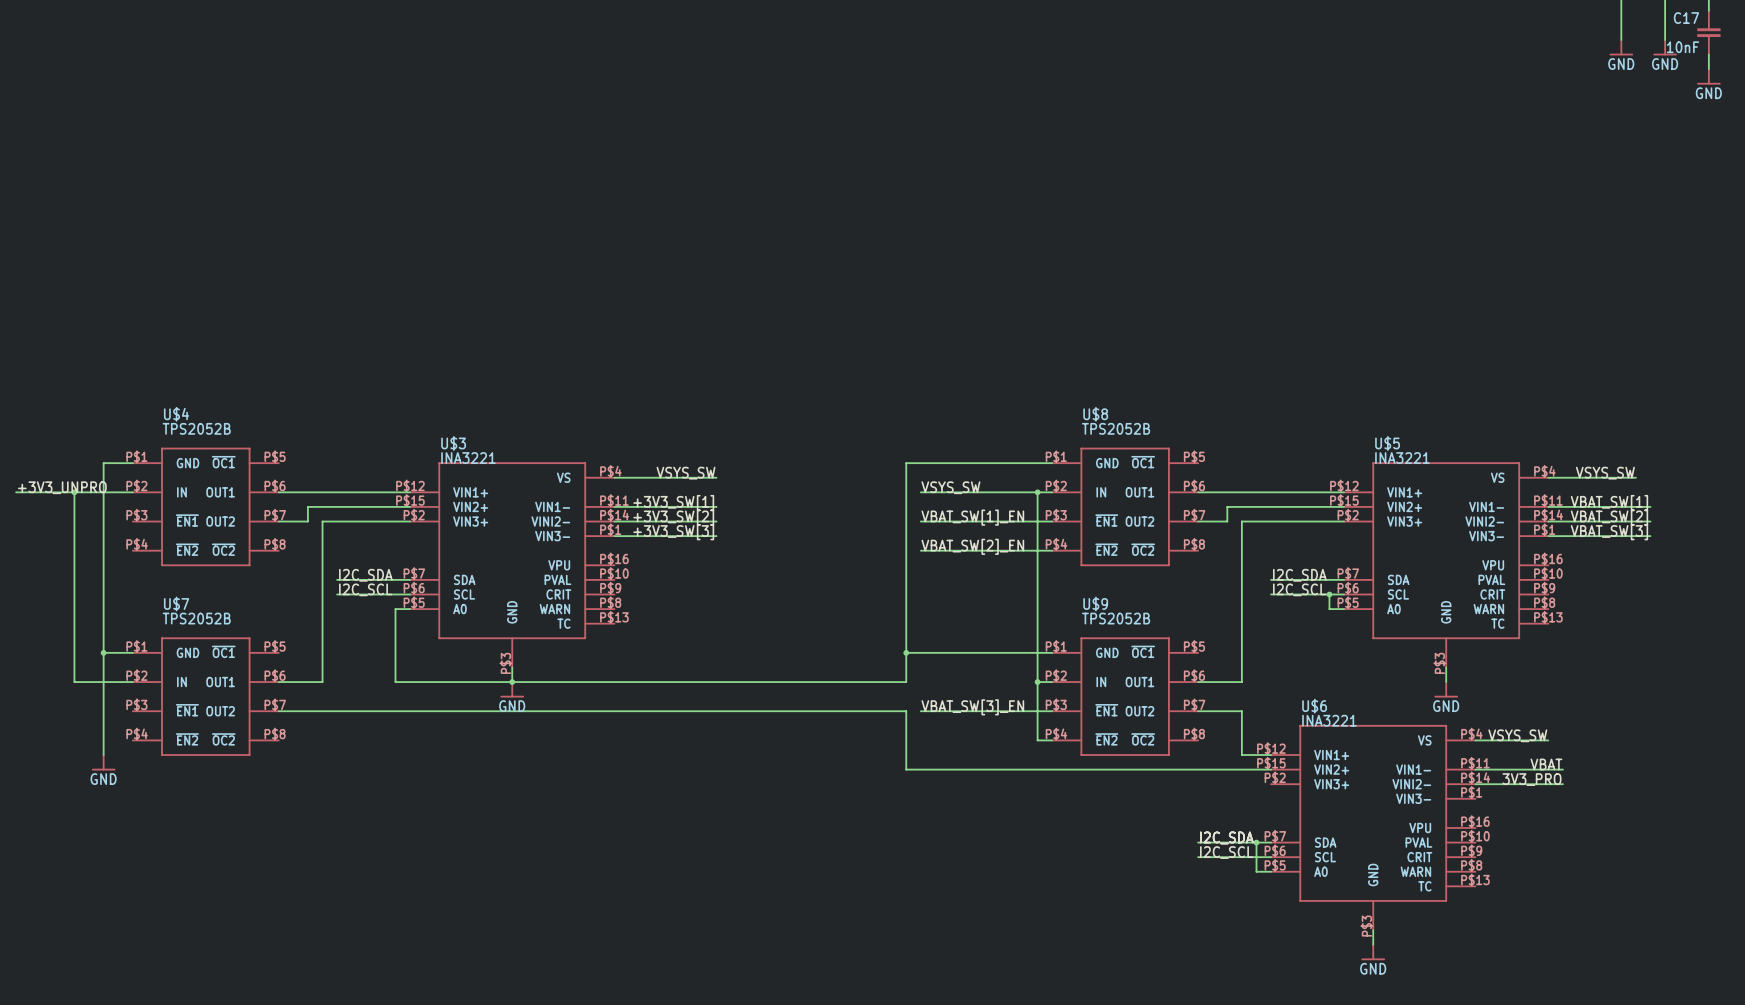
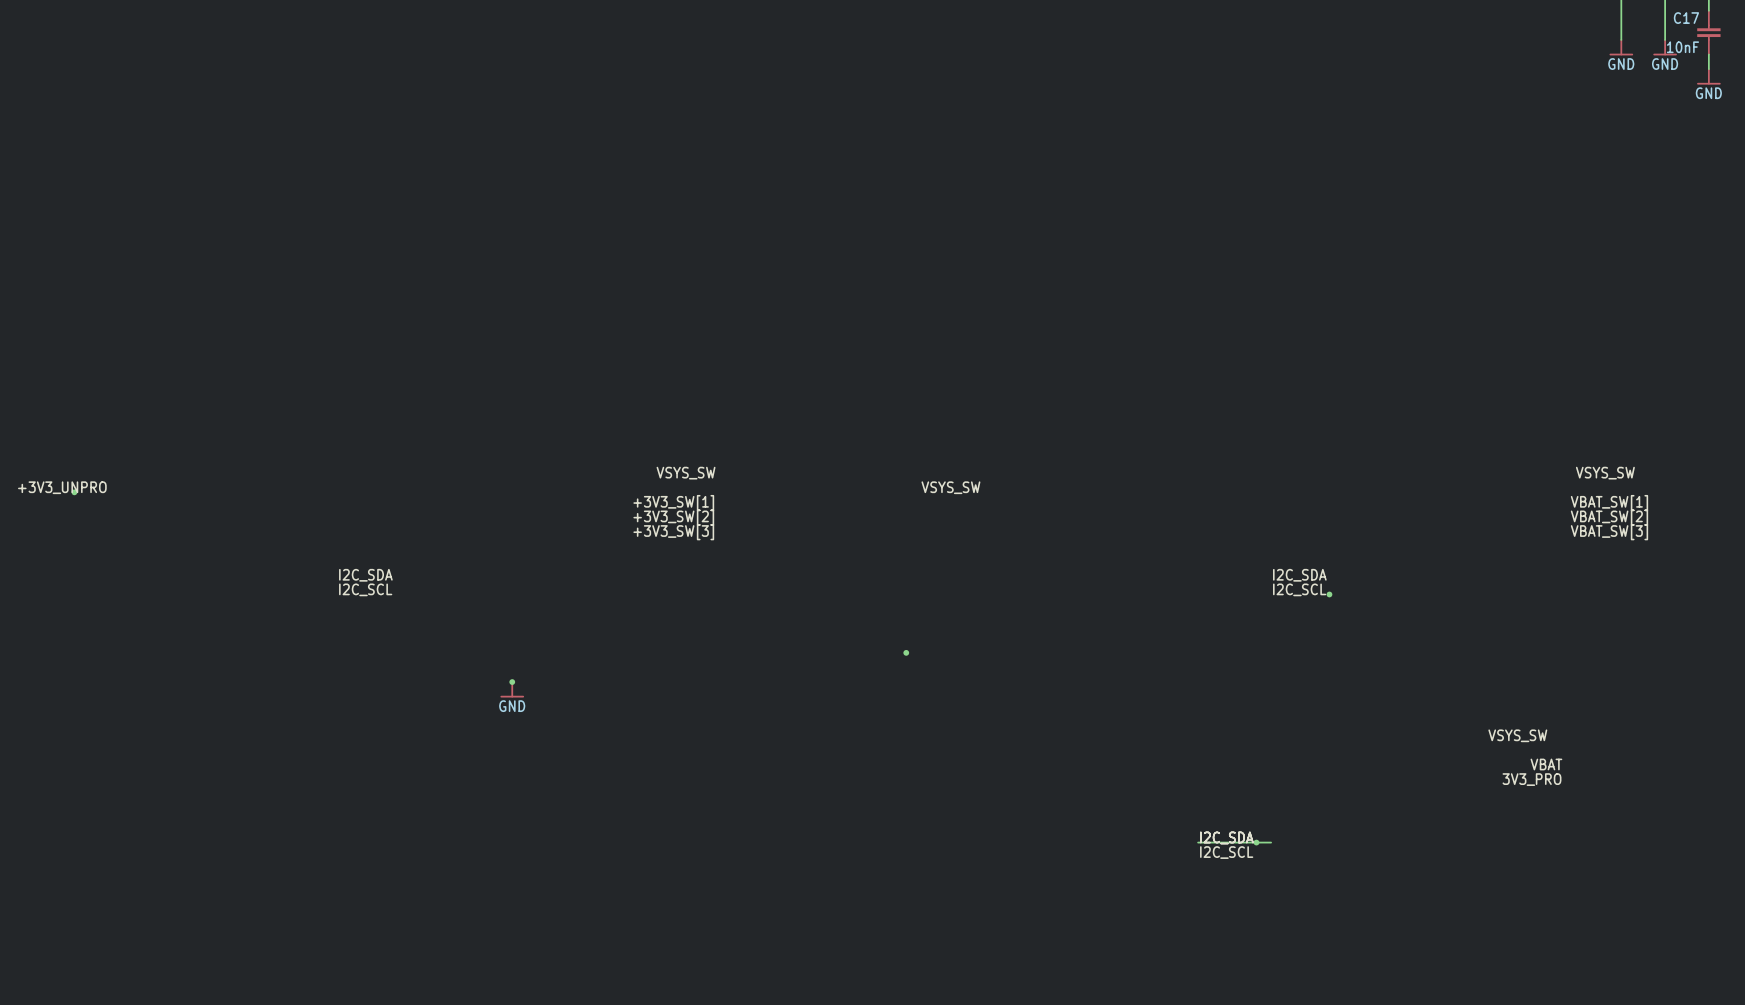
wire: (132, 463) (103, 463) (103, 755) -> none
wire: (1052, 463) (906, 463) (906, 682) (395, 682) (395, 609) (410, 609) -> none
wire: (614, 477) (716, 477) -> none
wire: (1548, 477) (1635, 477) -> none
wire: (16, 492) (132, 492) -> none
wire: (74, 492) (74, 682) (132, 682) -> none
wire: (278, 492) (410, 492) -> none
wire: (920, 492) (1052, 492) -> none
wire: (1037, 492) (1037, 740) (1052, 740) -> none
junction: (1037, 492) -> none
wire: (1198, 492) (1344, 492) -> none
U$4: TPS2052B (205, 506) -> none
wire: (410, 506) (307, 506) (307, 521) (278, 521) -> none
wire: (614, 506) (716, 506) -> none
U$8: TPS2052B (1125, 506) -> none
wire: (1344, 506) (1227, 506) (1227, 521) (1198, 521) -> none
wire: (1548, 506) (1650, 506) -> none
label: VBAT_SW[1]_EN (972, 517) -> none
wire: (410, 521) (322, 521) (322, 682) (278, 682) -> none
wire: (614, 521) (716, 521) -> none
wire: (920, 521) (1052, 521) -> none
wire: (1344, 521) (1241, 521) (1241, 682) (1198, 682) -> none
wire: (1548, 521) (1650, 521) -> none
wire: (614, 536) (716, 536) -> none
wire: (1548, 536) (1650, 536) -> none
label: VBAT_SW[2]_EN (972, 546) -> none
wire: (920, 550) (1052, 550) -> none
U$3: INA3221 (512, 564) -> none
U$5: INA3221 (1446, 564) -> none
wire: (337, 579) (410, 579) -> none
wire: (1271, 579) (1344, 579) -> none
wire: (337, 594) (410, 594) -> none
wire: (1271, 594) (1344, 594) -> none
wire: (1329, 594) (1329, 609) (1344, 609) -> none
wire: (103, 652) (132, 652) -> none
junction: (103, 652) -> none
wire: (906, 652) (1052, 652) -> none
wire: (512, 667) (512, 682) -> none
wire: (1446, 667) (1446, 682) -> none
wire: (1037, 682) (1052, 682) -> none
junction: (1037, 682) -> none
power symbol: GND (1446, 689) -> none
U$7: TPS2052B (205, 696) -> none
U$9: TPS2052B (1125, 696) -> none
label: VBAT_SW[3]_EN (972, 707) -> none
wire: (278, 711) (906, 711) (906, 769) (1271, 769) -> none
wire: (920, 711) (1052, 711) -> none
wire: (1198, 711) (1241, 711) (1241, 755) (1271, 755) -> none
wire: (1475, 740) (1548, 740) -> none
power symbol: GND (103, 762) -> none
wire: (1475, 769) (1562, 769) -> none
wire: (1475, 784) (1562, 784) -> none
U$6: INA3221 (1373, 827) -> none
wire: (1256, 842) (1256, 871) (1271, 871) -> none
wire: (1198, 857) (1271, 857) -> none
wire: (1373, 930) (1373, 944) -> none
power symbol: GND (1373, 952) -> none

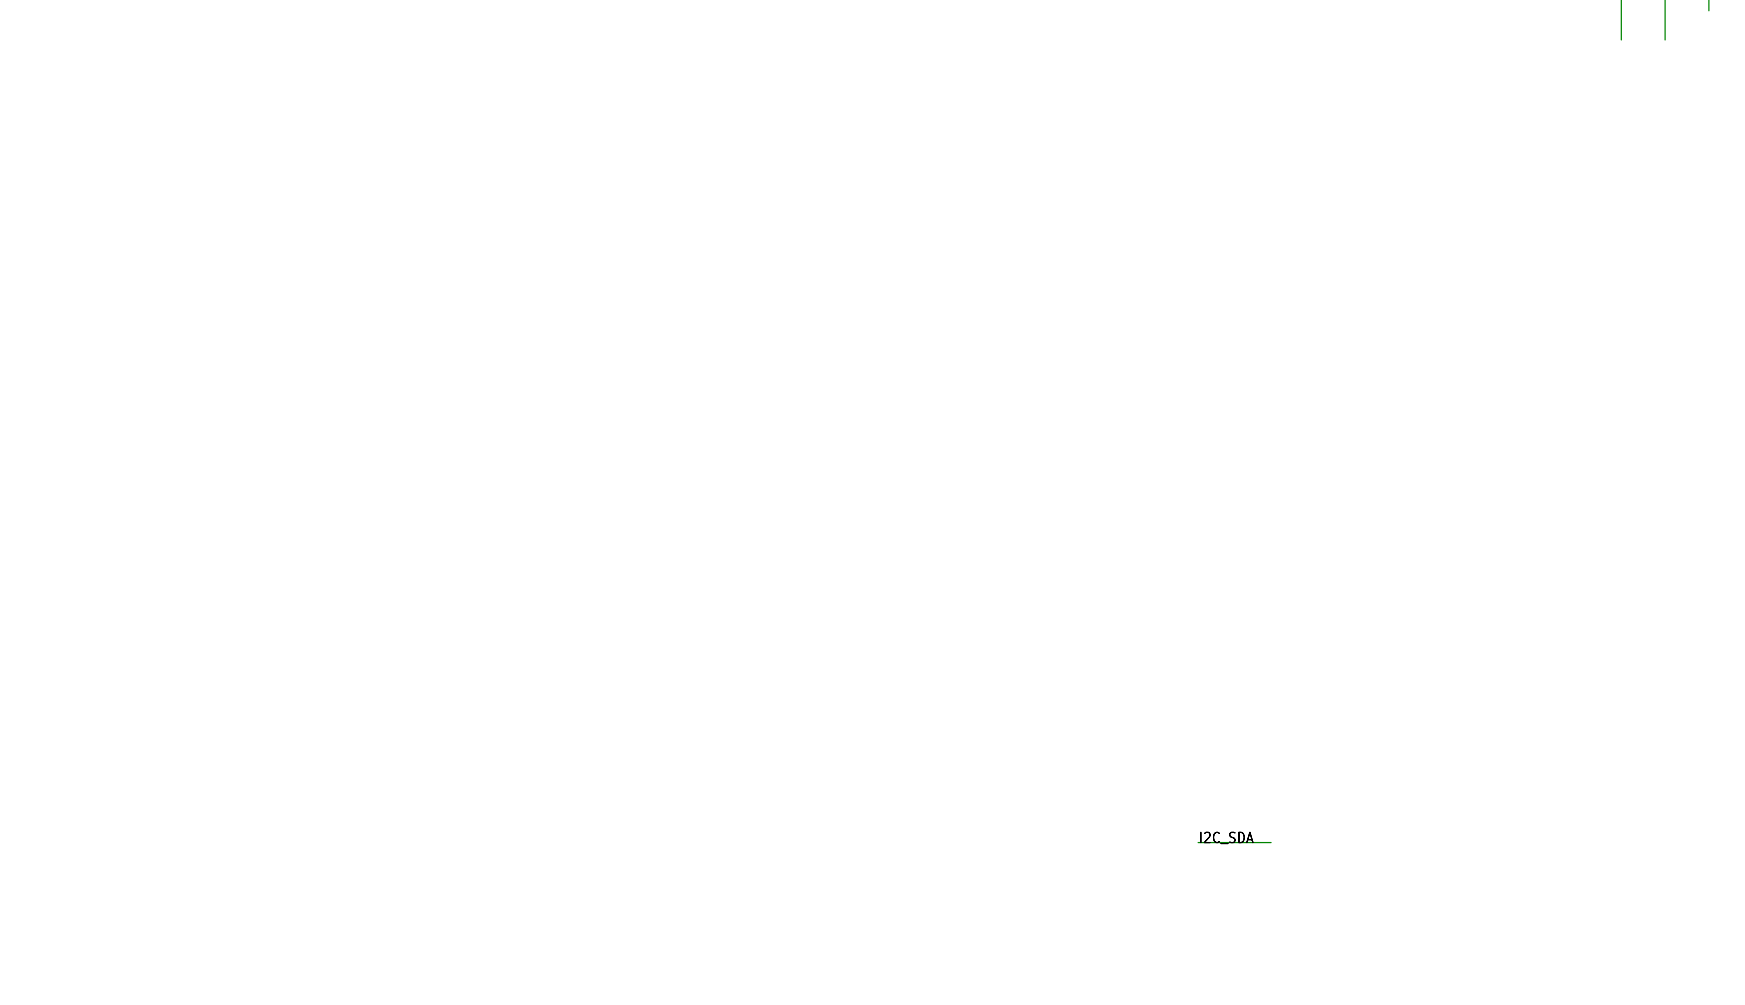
C17: 10nF (1708, 32) -> none
power symbol: GND (1621, 47) -> none
power symbol: GND (1665, 47) -> none
wire: (1708, 54) (1708, 69) -> none
power symbol: GND (1708, 76) -> none
label: VSYS_SW (686, 473) -> none
label: VSYS_SW (1605, 473) -> none
label: +3V3_UNPRO (62, 487) -> none
label: VSYS_SW (950, 487) -> none
junction: (74, 492) -> none
label: +3V3_SW[1] (673, 503) -> none
label: VBAT_SW[1] (1609, 503) -> none
label: +3V3_SW[2] (673, 517) -> none
label: VBAT_SW[2] (1609, 517) -> none
label: +3V3_SW[3] (673, 532) -> none
label: VBAT_SW[3] (1609, 532) -> none
label: I2C_SDA (365, 575) -> none
label: I2C_SDA (1299, 575) -> none
label: I2C_SCL (365, 589) -> none
label: I2C_SCL (1299, 589) -> none
junction: (1329, 594) -> none
junction: (906, 652) -> none
junction: (512, 682) -> none
power symbol: GND (512, 689) -> none
label: VSYS_SW (1517, 735) -> none
label: VBAT (1546, 764) -> none
label: 3V3_PRO (1531, 779) -> none
junction: (1256, 842) -> none
label: I2C_SCL (1226, 852) -> none

